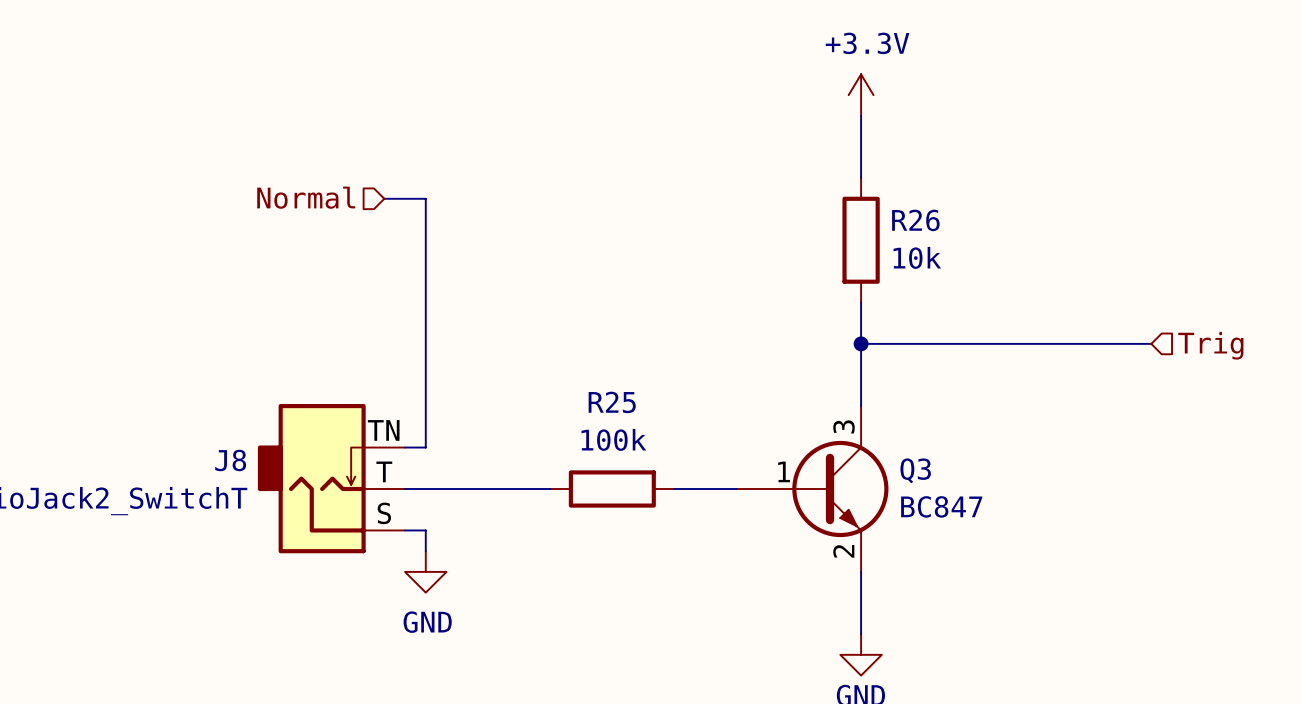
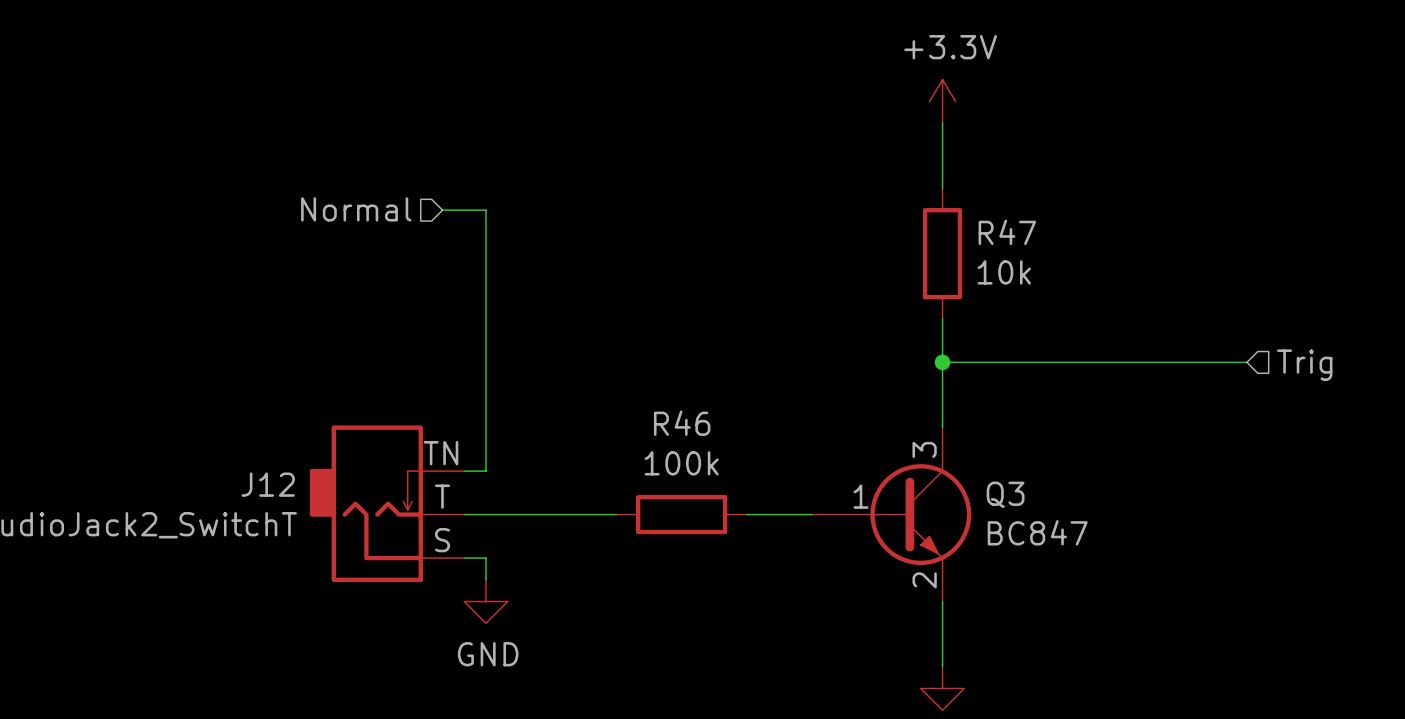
R26 name: R26 (915, 220) -> R47 (1007, 232)
R25 name: R25 (612, 402) -> R46 (682, 423)
J8 name: J8 (230, 460) -> J12 (268, 484)

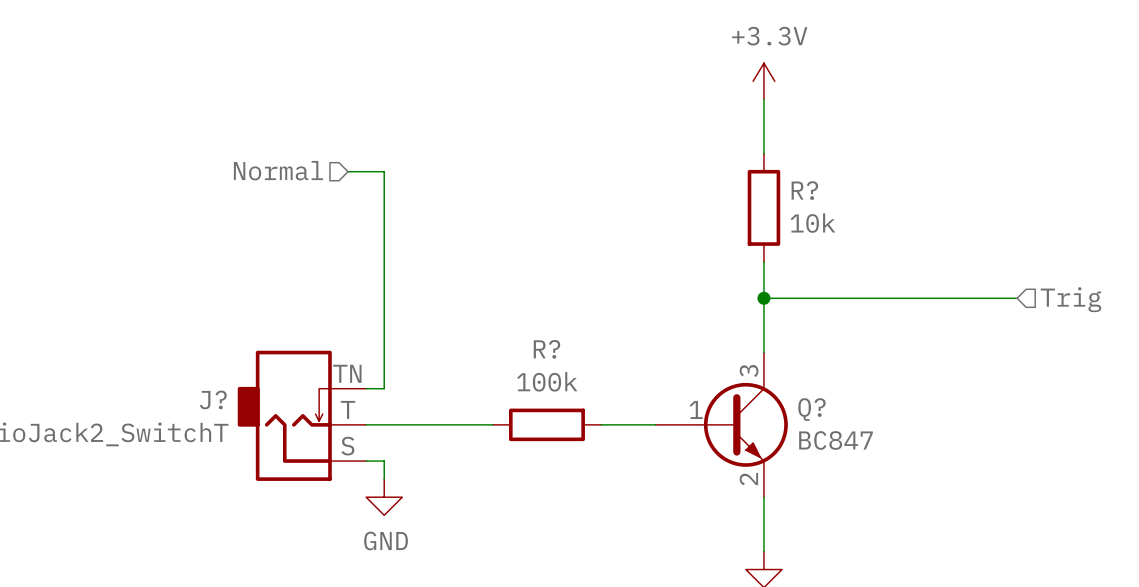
R47 name: R47 (1007, 232) -> R? (804, 190)
R46 name: R46 (682, 423) -> R? (546, 349)
J12 name: J12 (268, 484) -> J? (213, 399)
Q3 name: Q3 (1005, 494) -> Q? (811, 409)

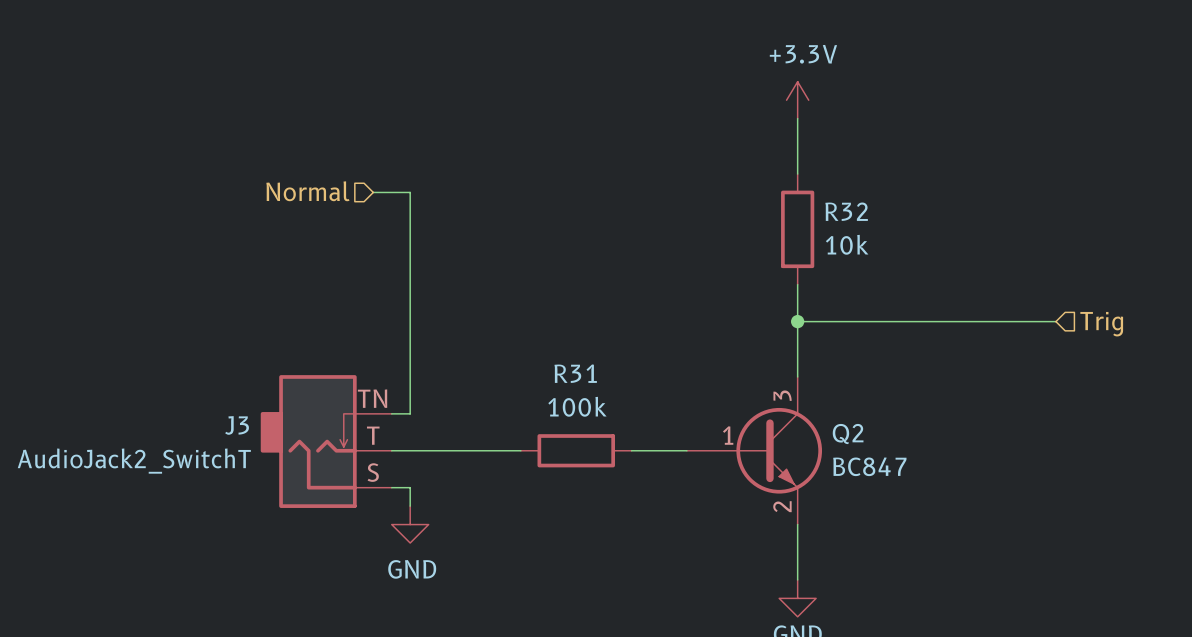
R? name: R? (804, 190) -> R32 (846, 211)
R? name: R? (546, 349) -> R31 (575, 373)
J? name: J? (213, 399) -> J3 (237, 425)
Q? name: Q? (811, 409) -> Q2 (848, 434)

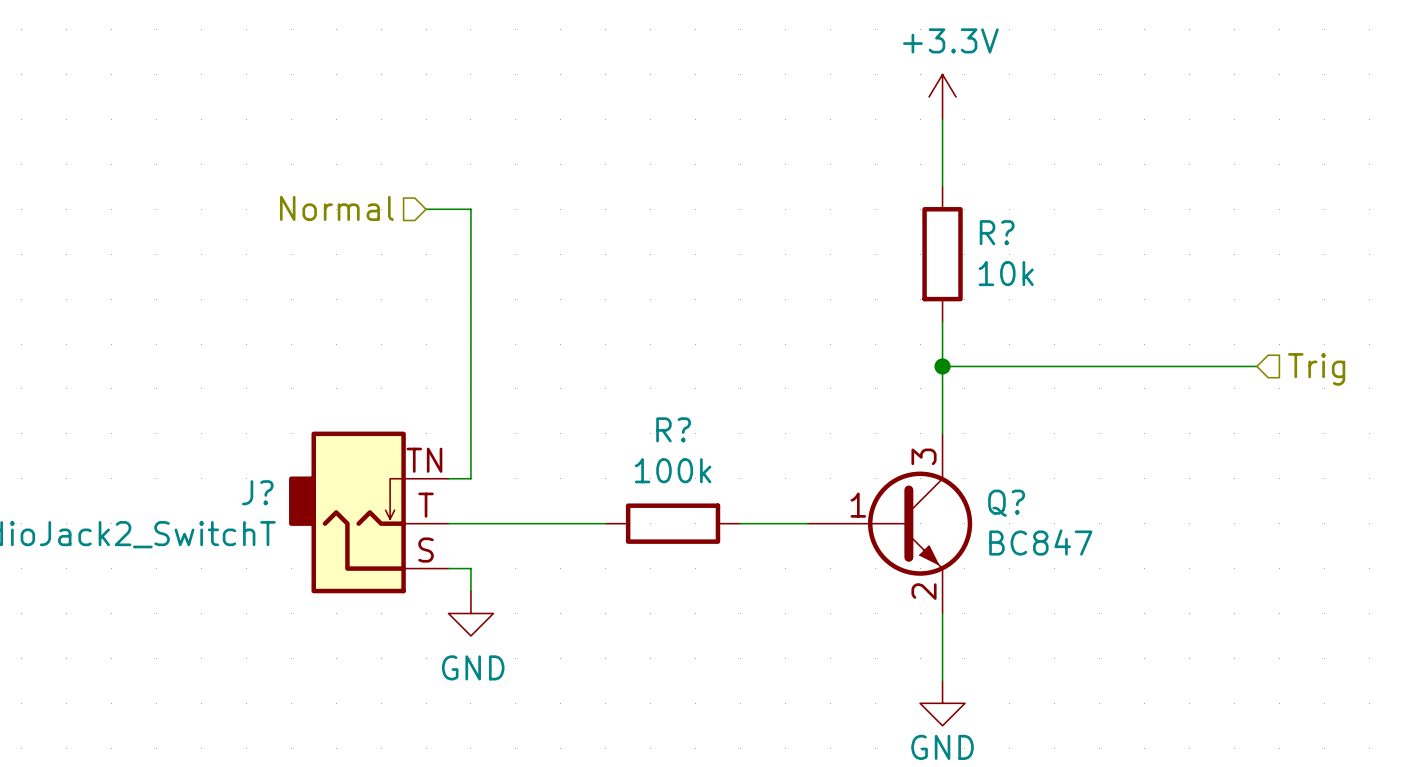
R32 name: R32 (846, 211) -> R? (997, 232)
R31 name: R31 (575, 373) -> R? (673, 429)
J3 name: J3 (237, 425) -> J? (257, 492)
Q2 name: Q2 (848, 434) -> Q? (1006, 503)

